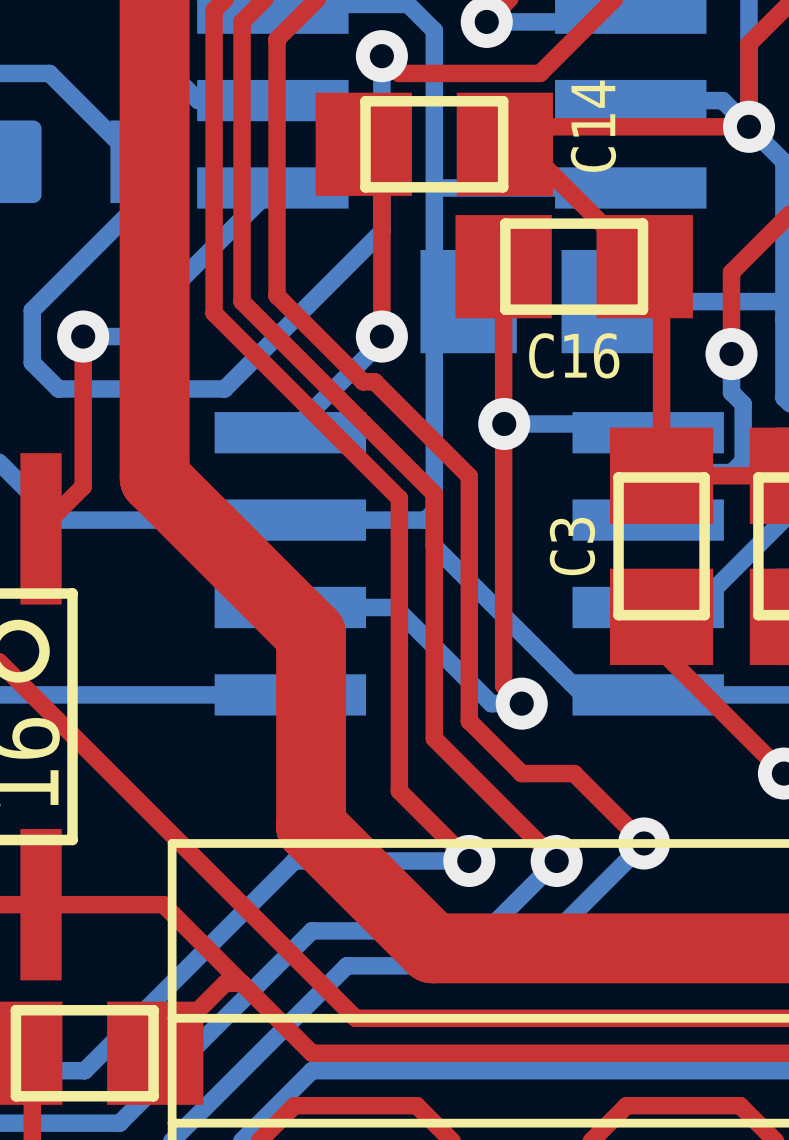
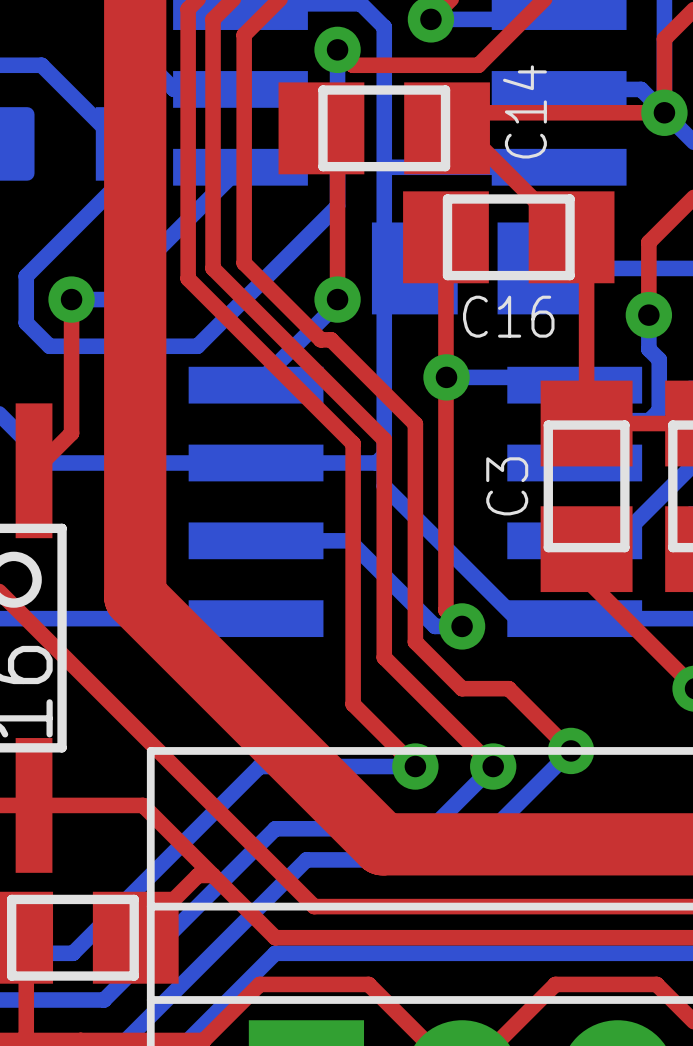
top track: (154, 478) (311, 634) (311, 826) -> (135, 425) (135, 596) (274, 736)

